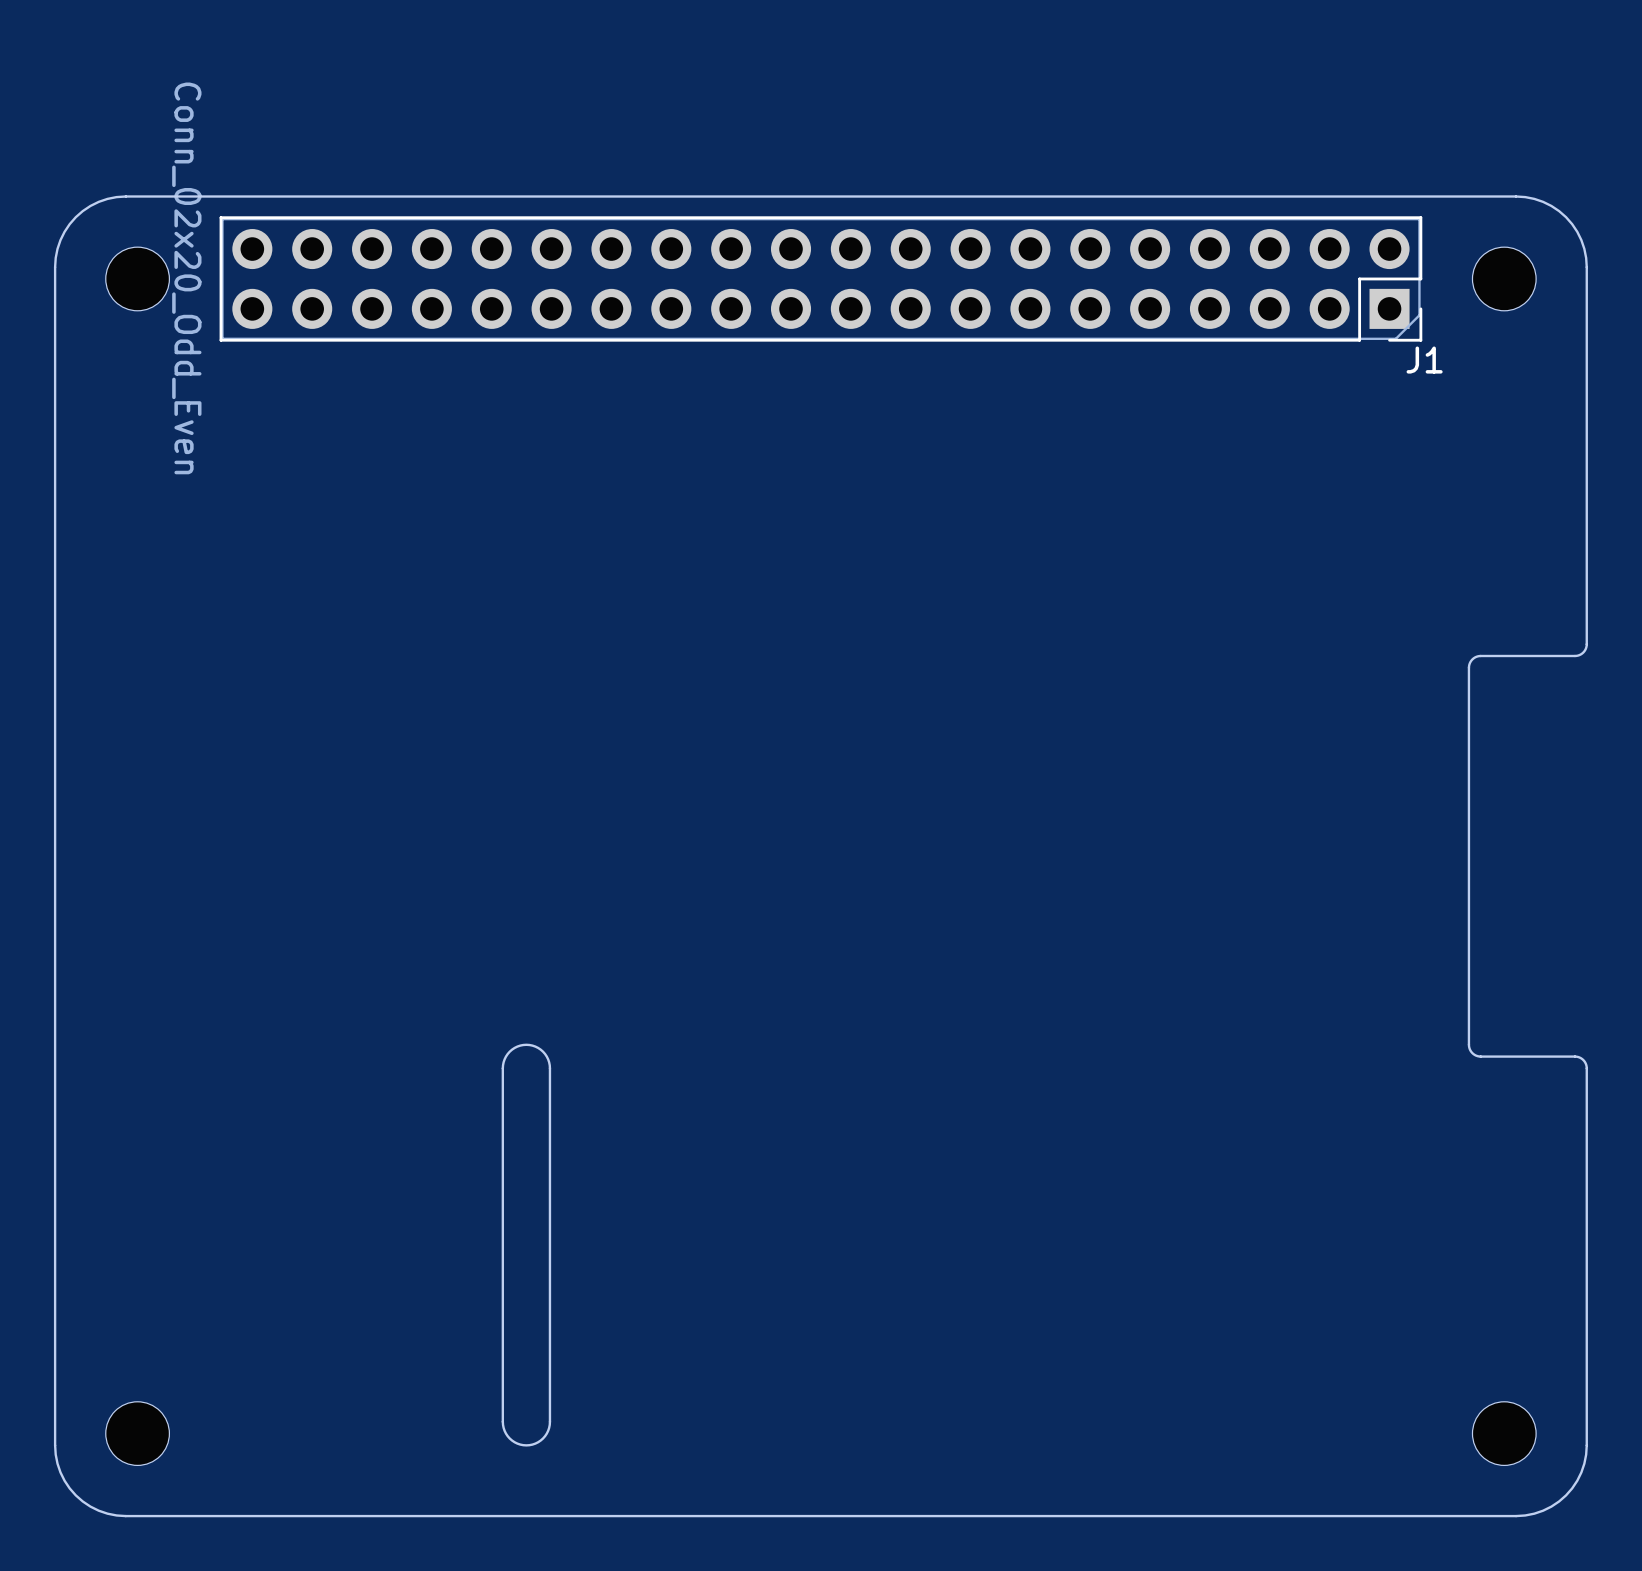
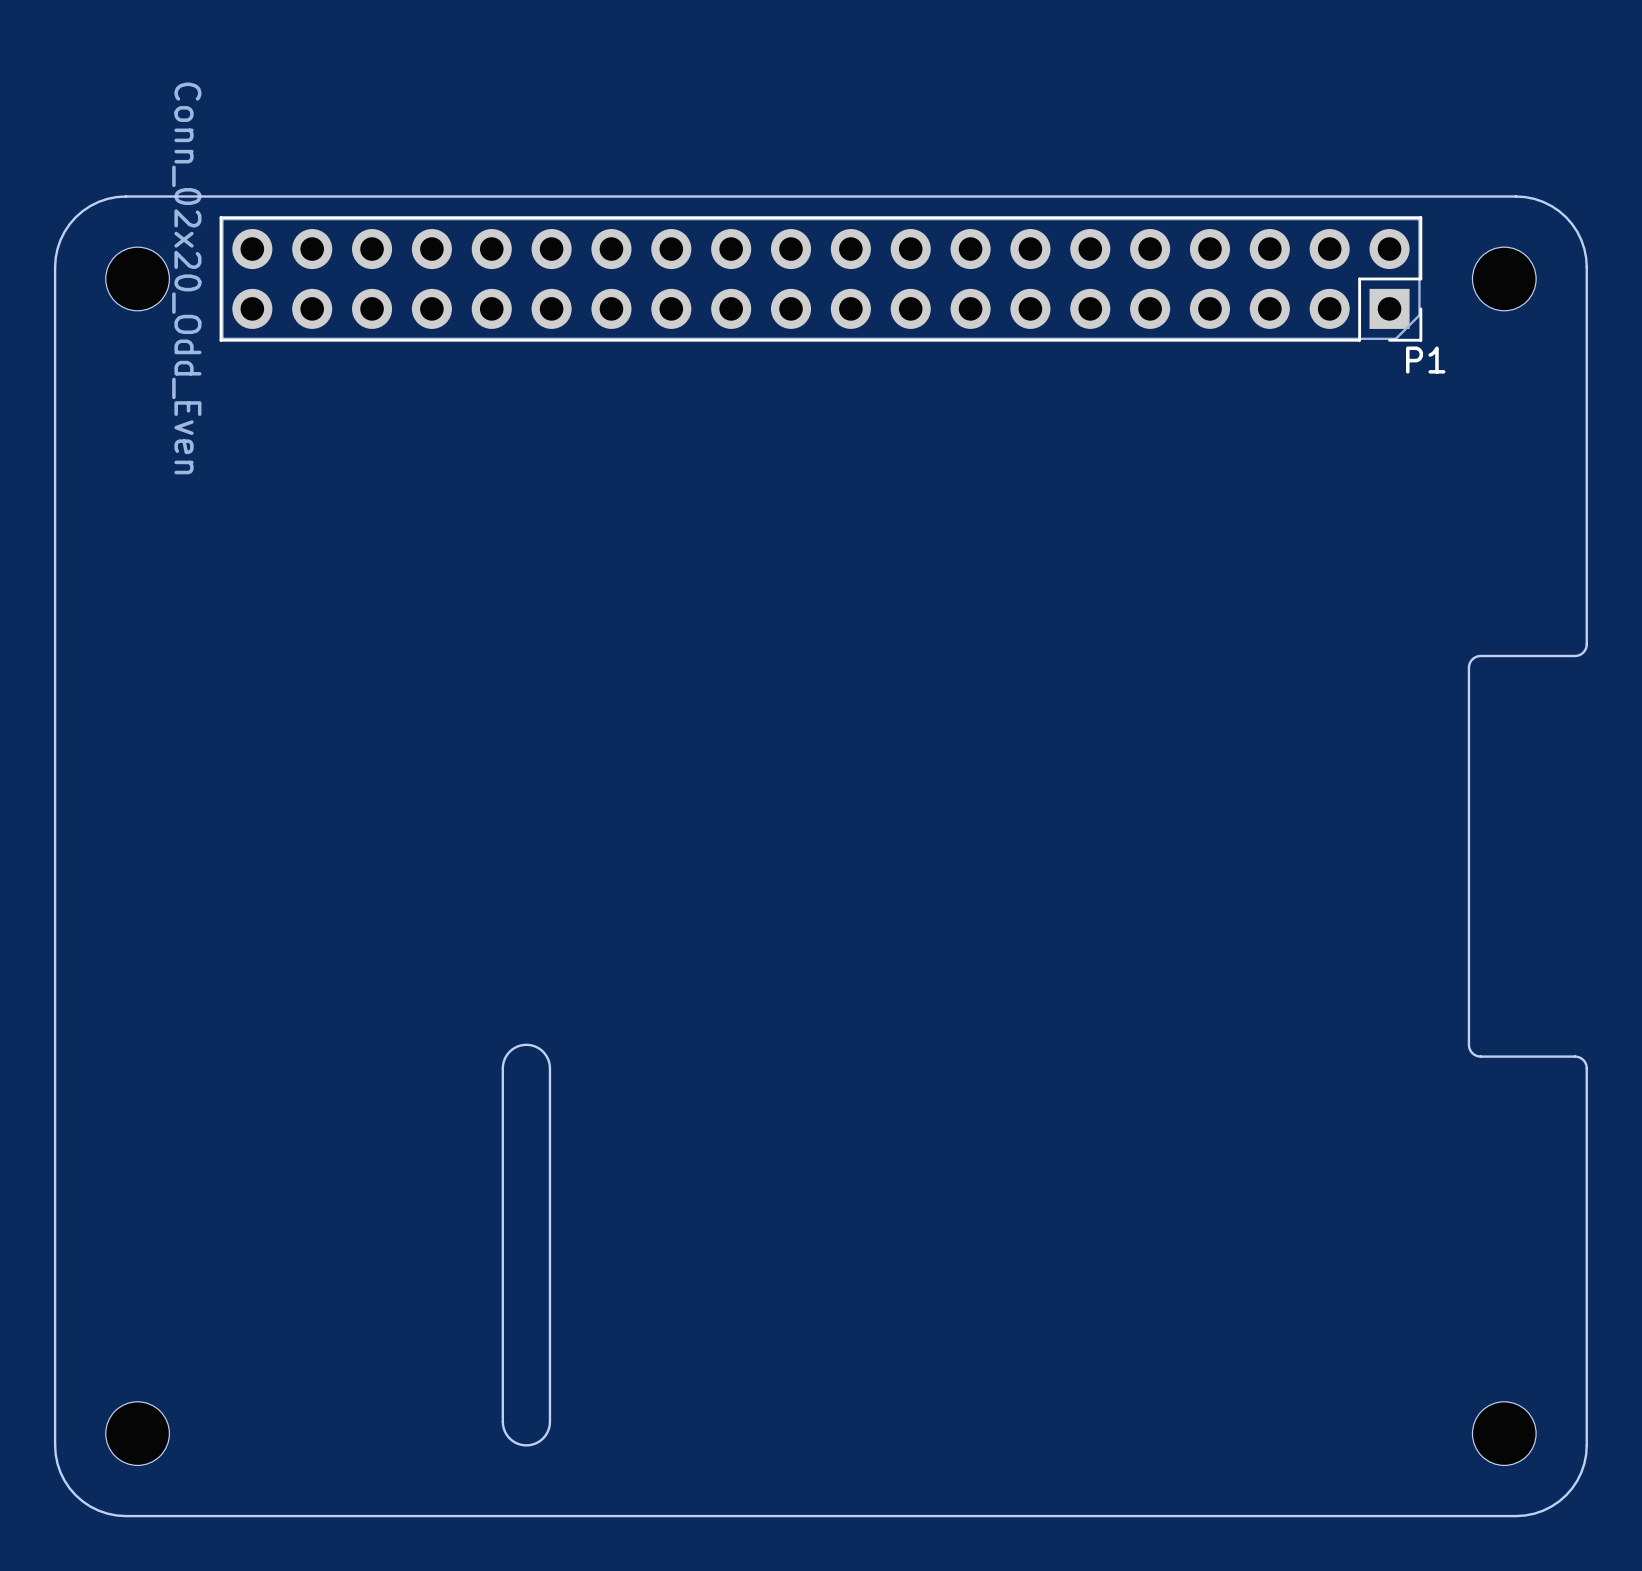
J1 name: J1 (1424, 360) -> P1 (1425, 360)

